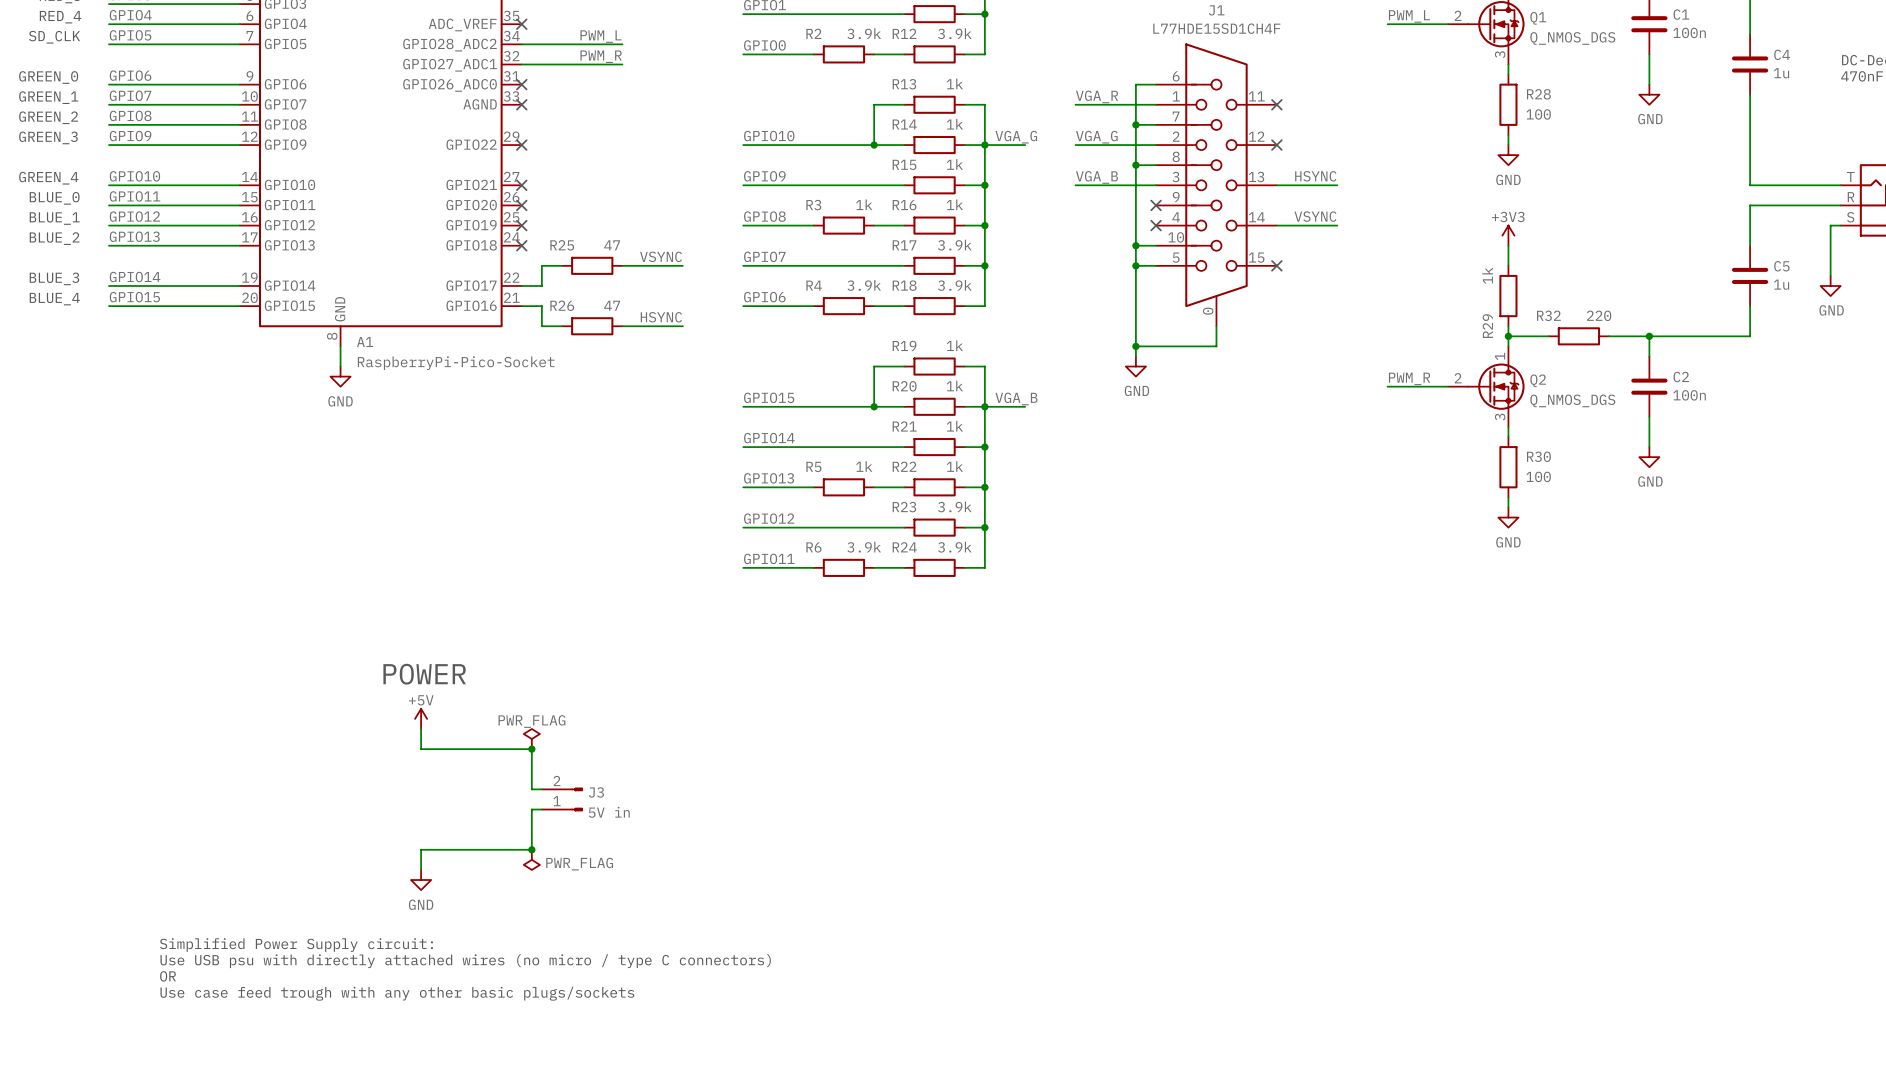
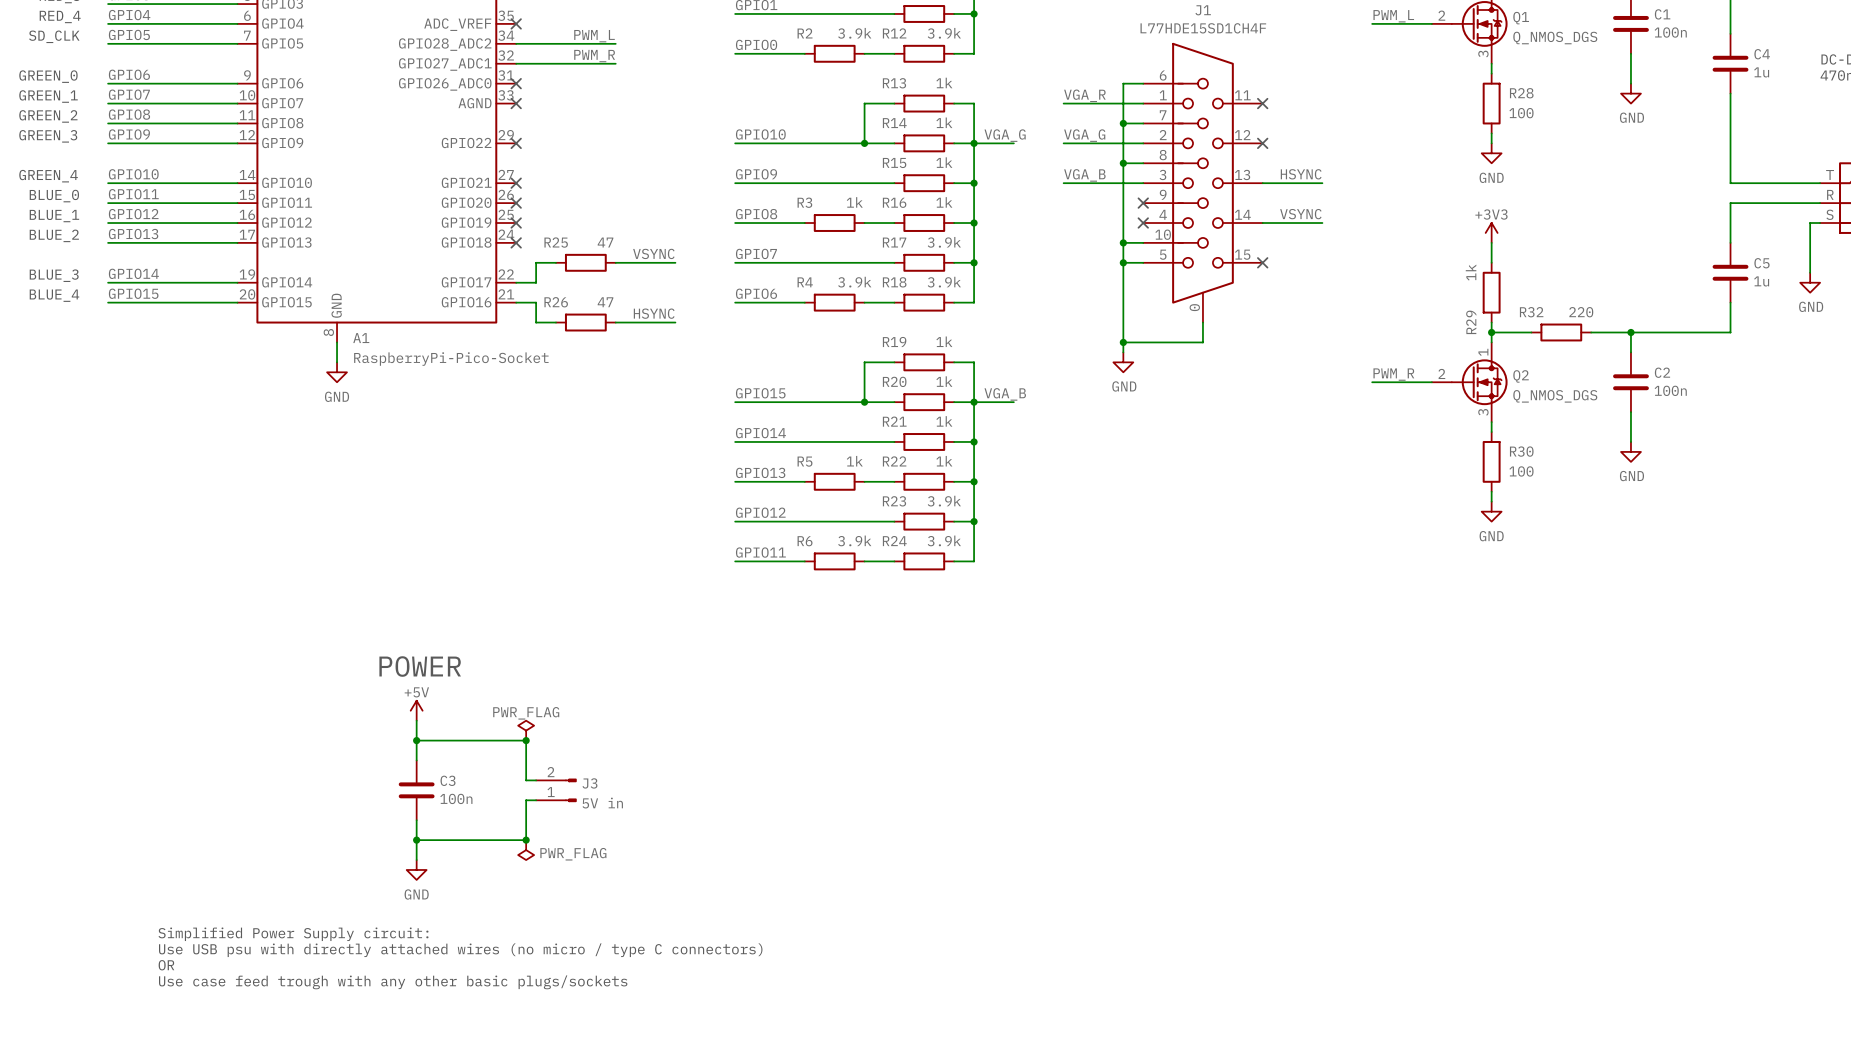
wire: none -> (416, 740) (416, 760)
junction: none -> (416, 740)
C3: none -> 100n (416, 790)
wire: none -> (416, 820) (416, 840)
junction: none -> (416, 840)

